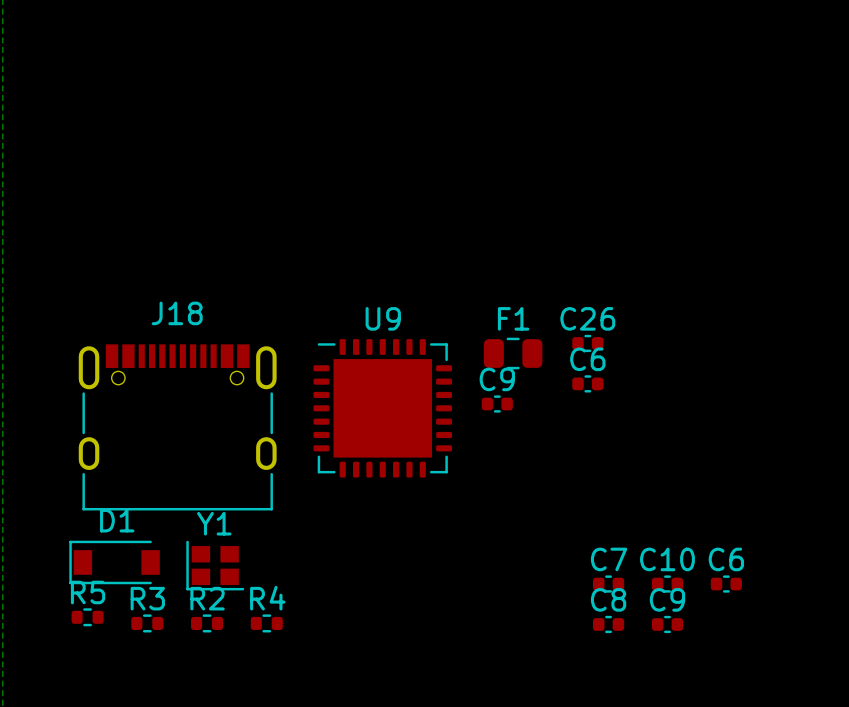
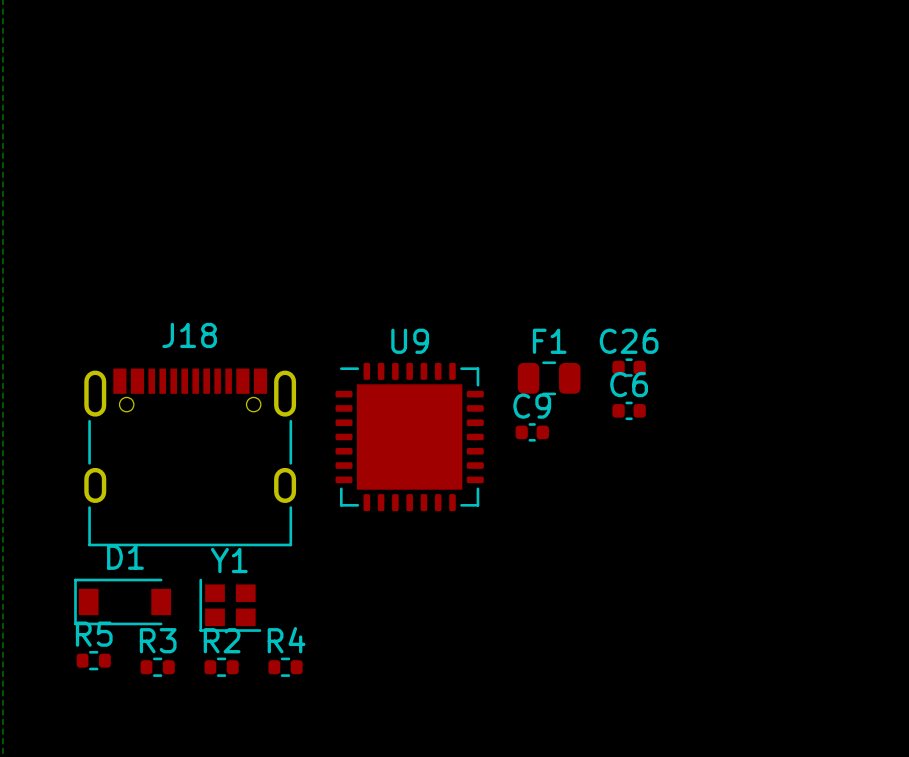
C7: (608, 584) -> none
C10: (667, 584) -> none
C6: (726, 584) -> none
C8: (608, 624) -> none
C9: (667, 624) -> none

